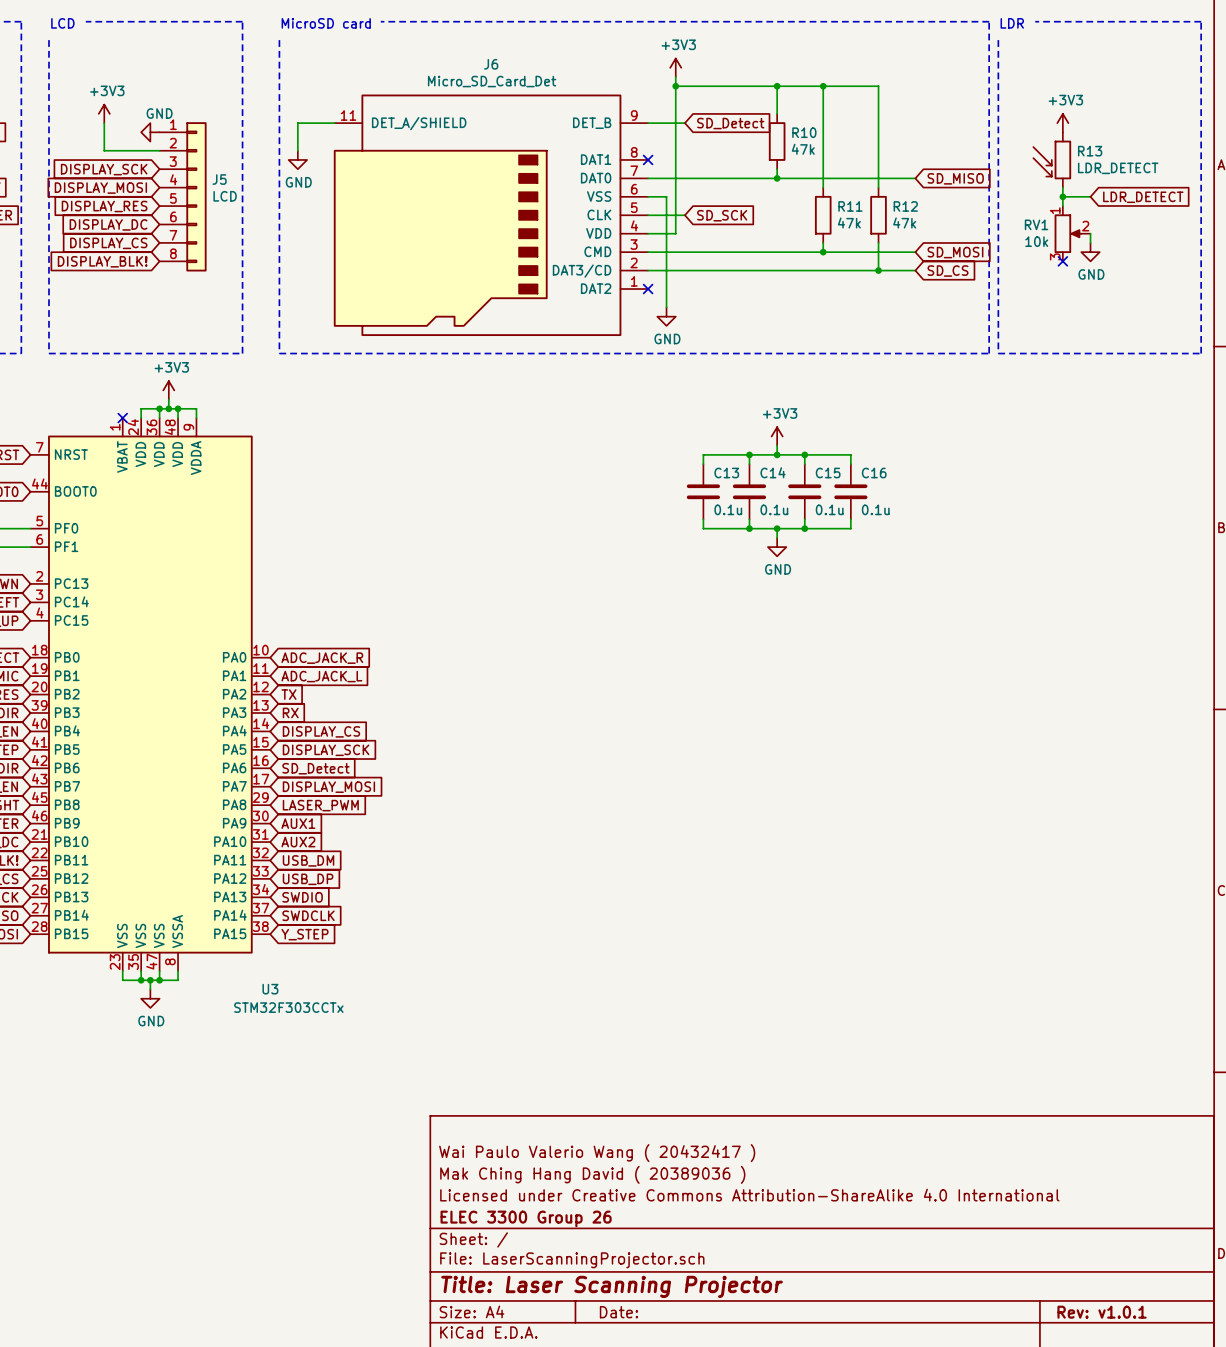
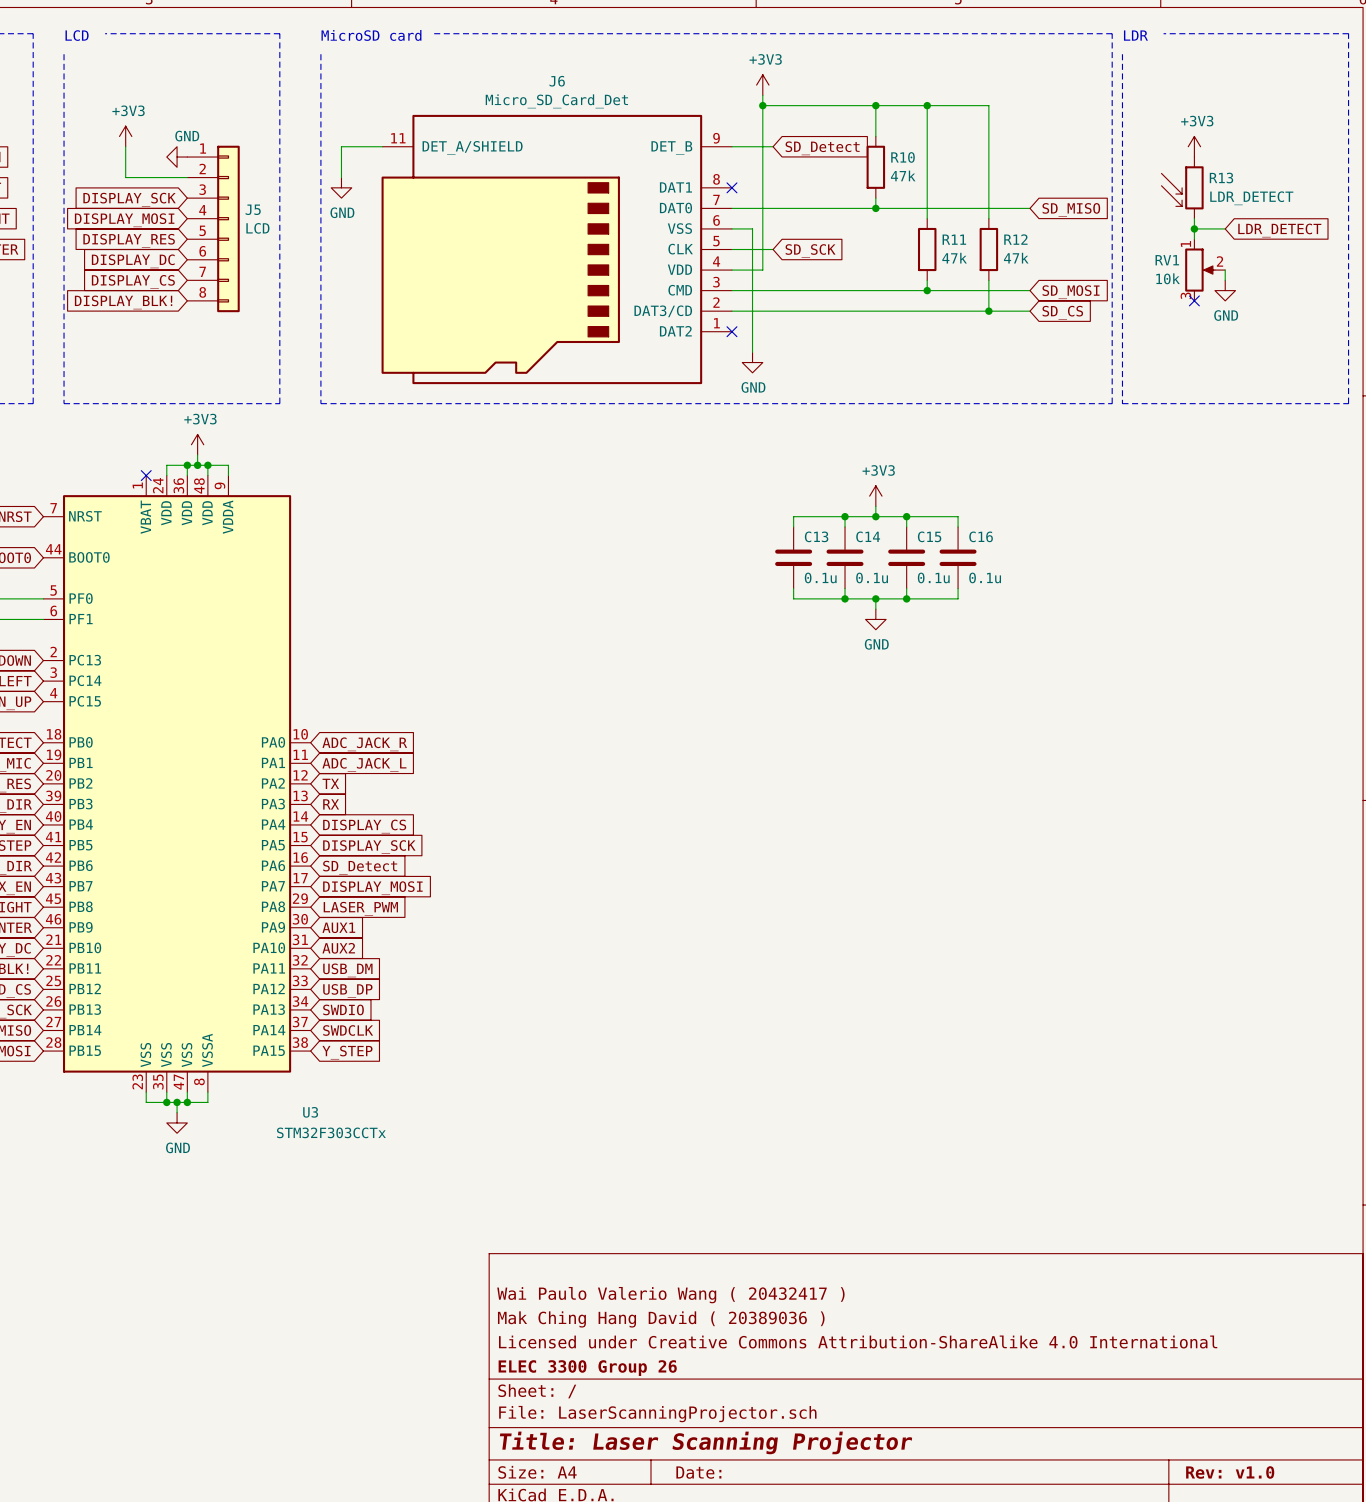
title block: Rev: v1.0.1 (1102, 1312) -> Rev: v1.0 (1230, 1472)

